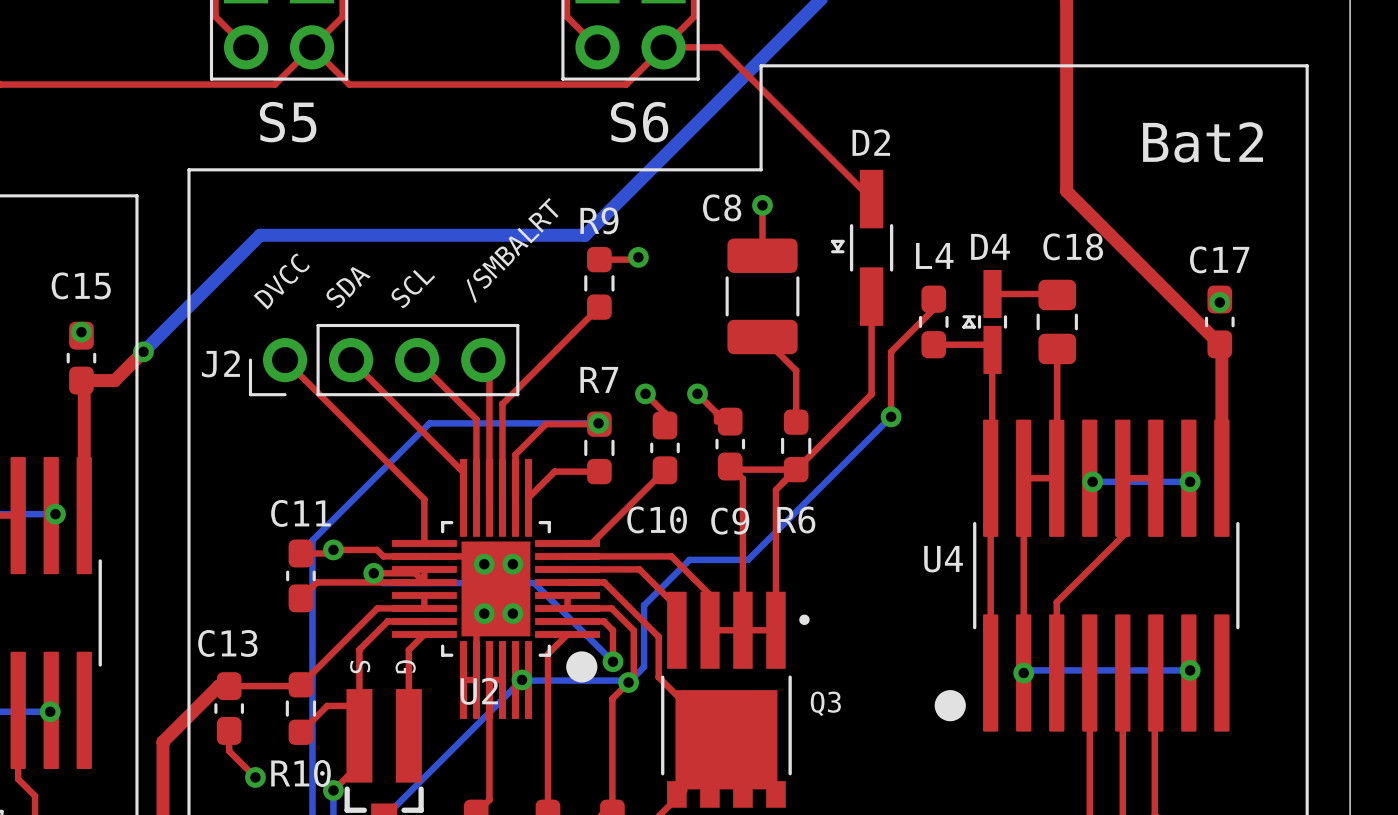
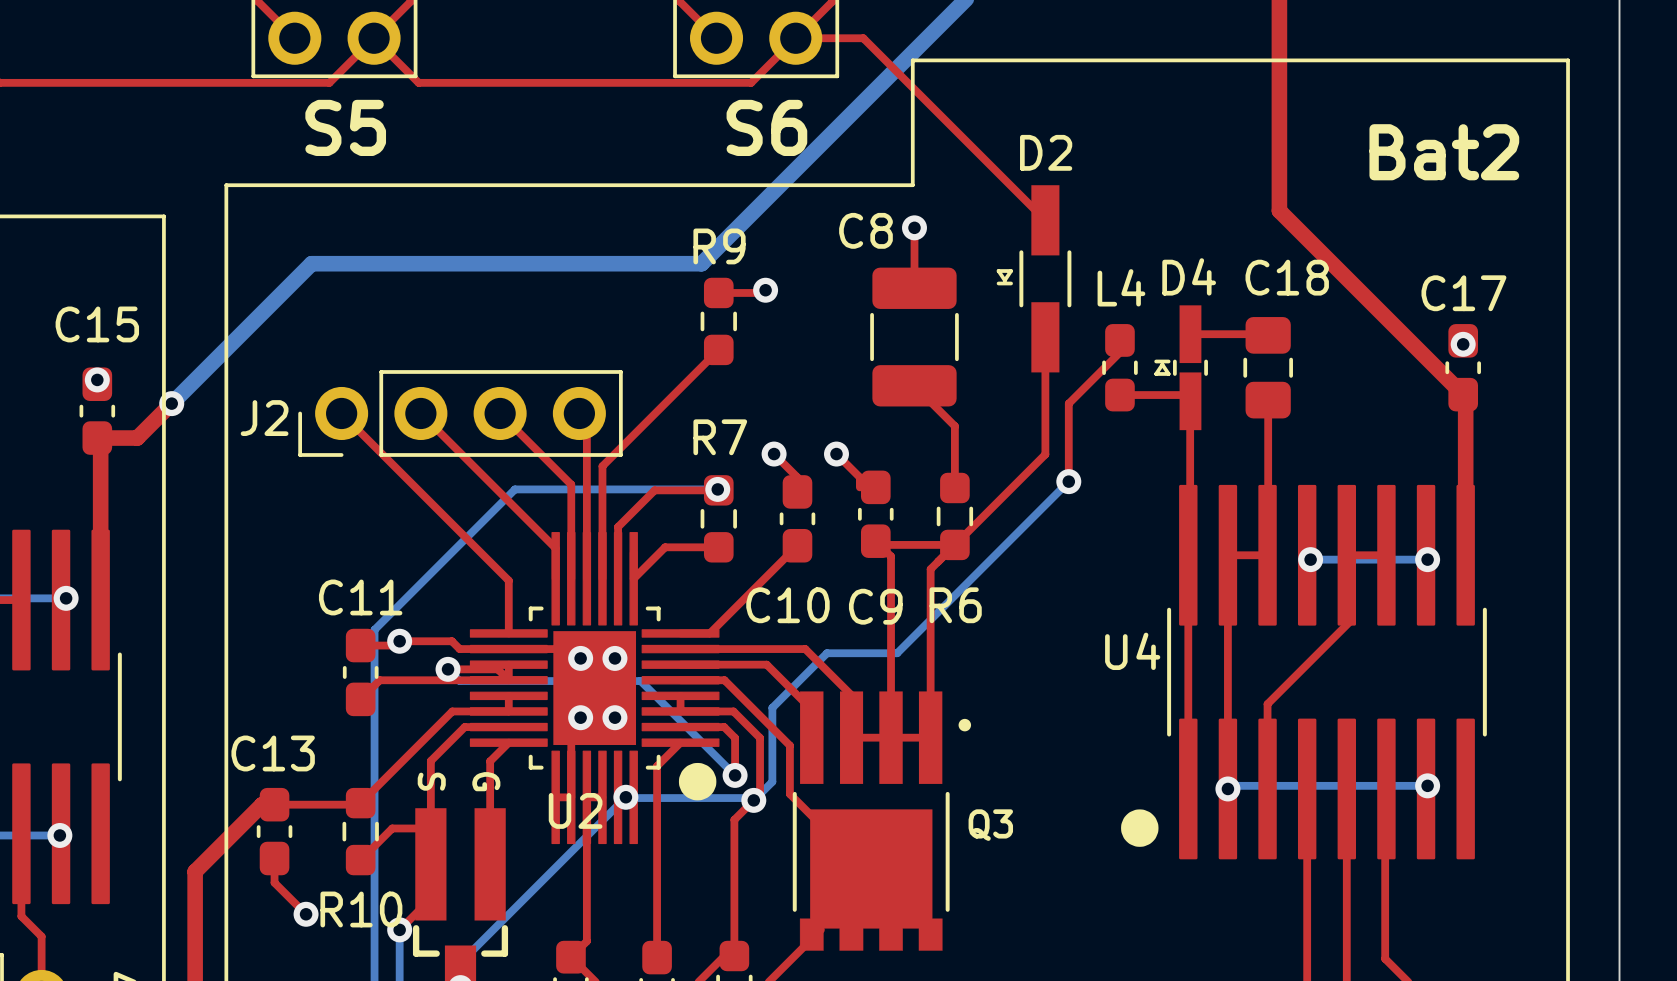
text: /SMBALRT (512, 250) -> none
text: DVCC (281, 281) -> none
text: SDA (348, 287) -> none
text: SCL (413, 289) -> none

